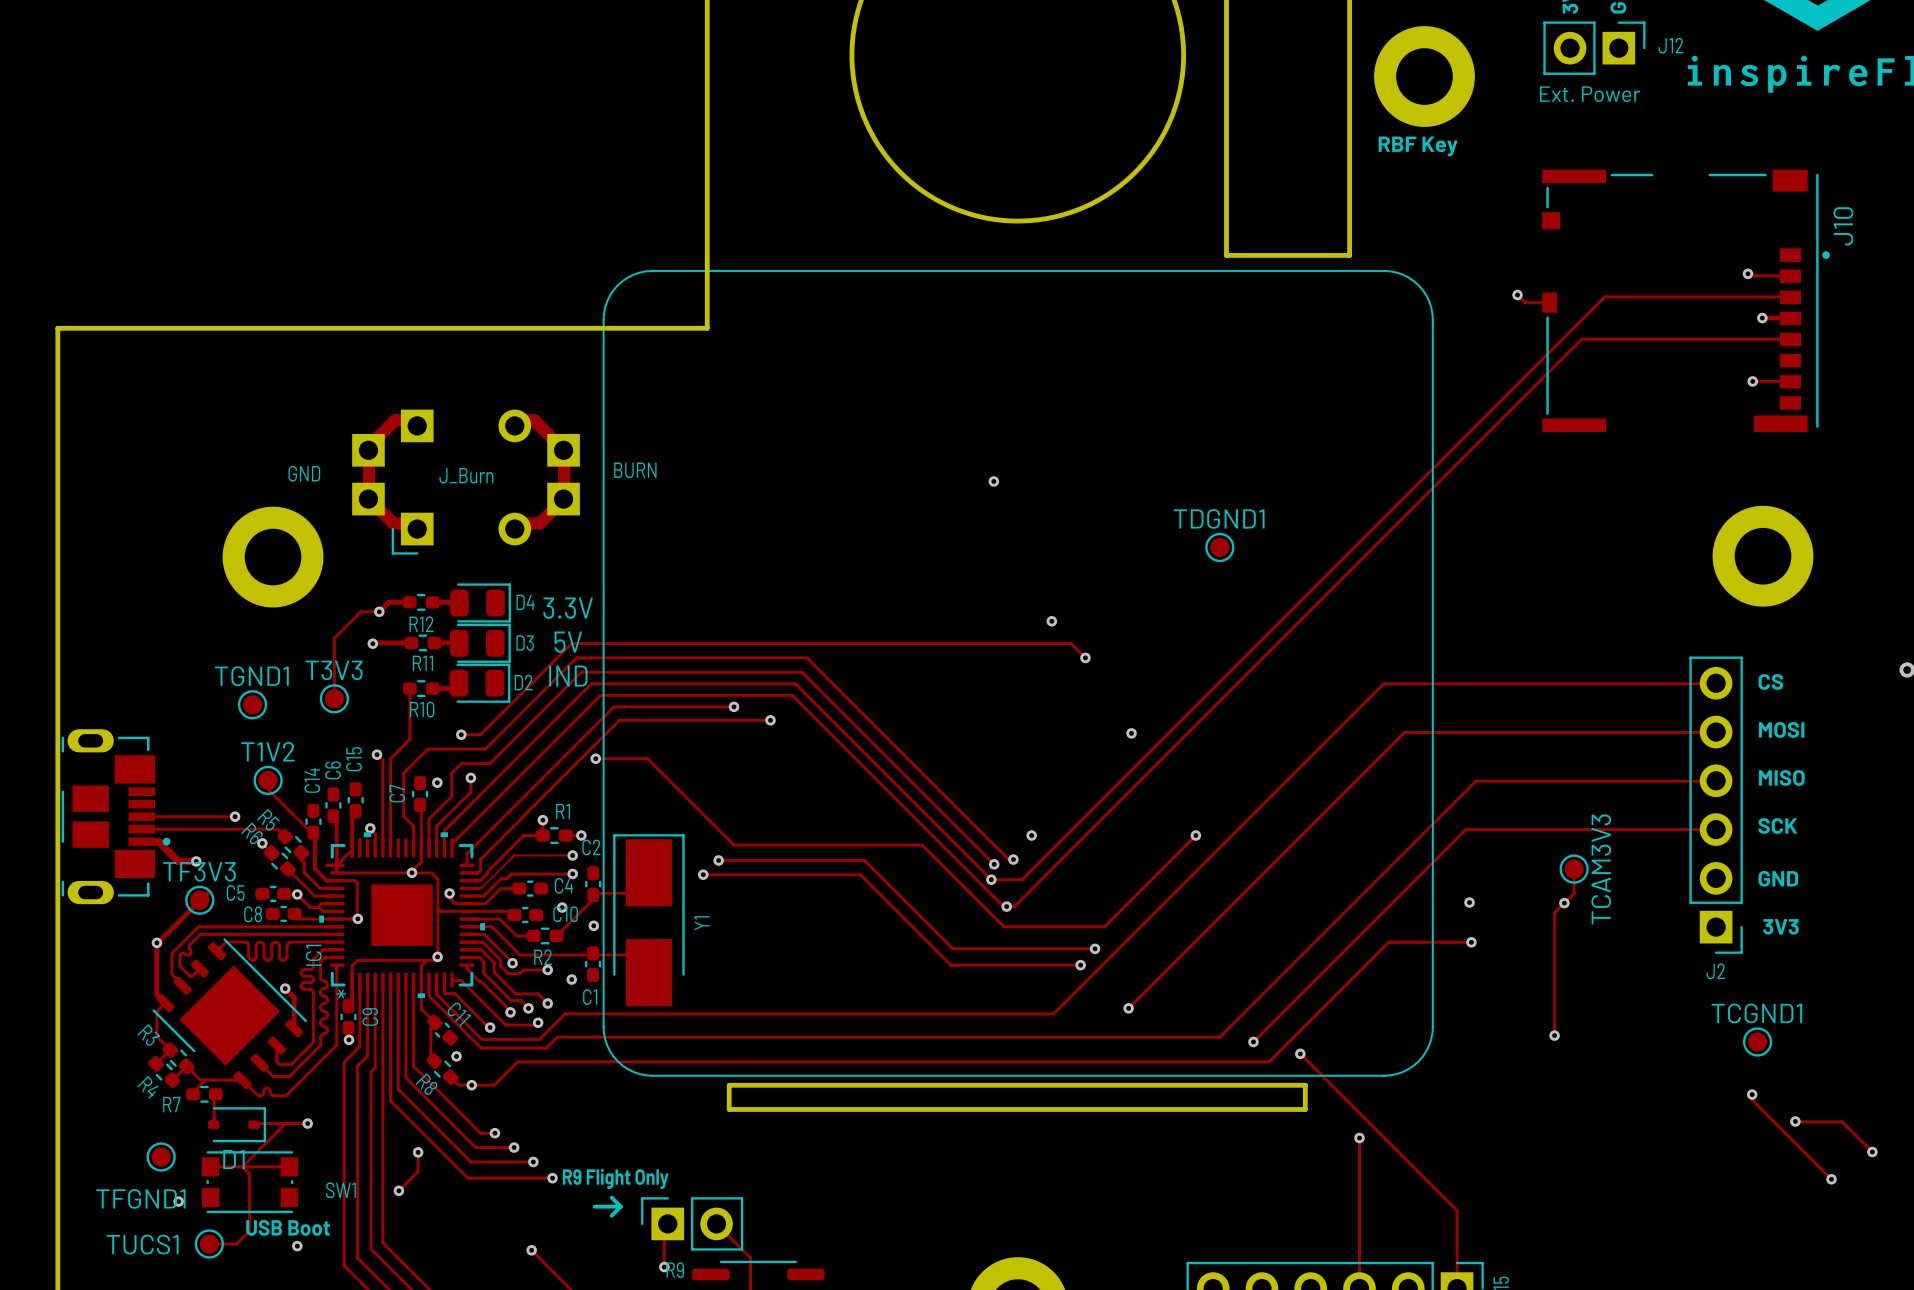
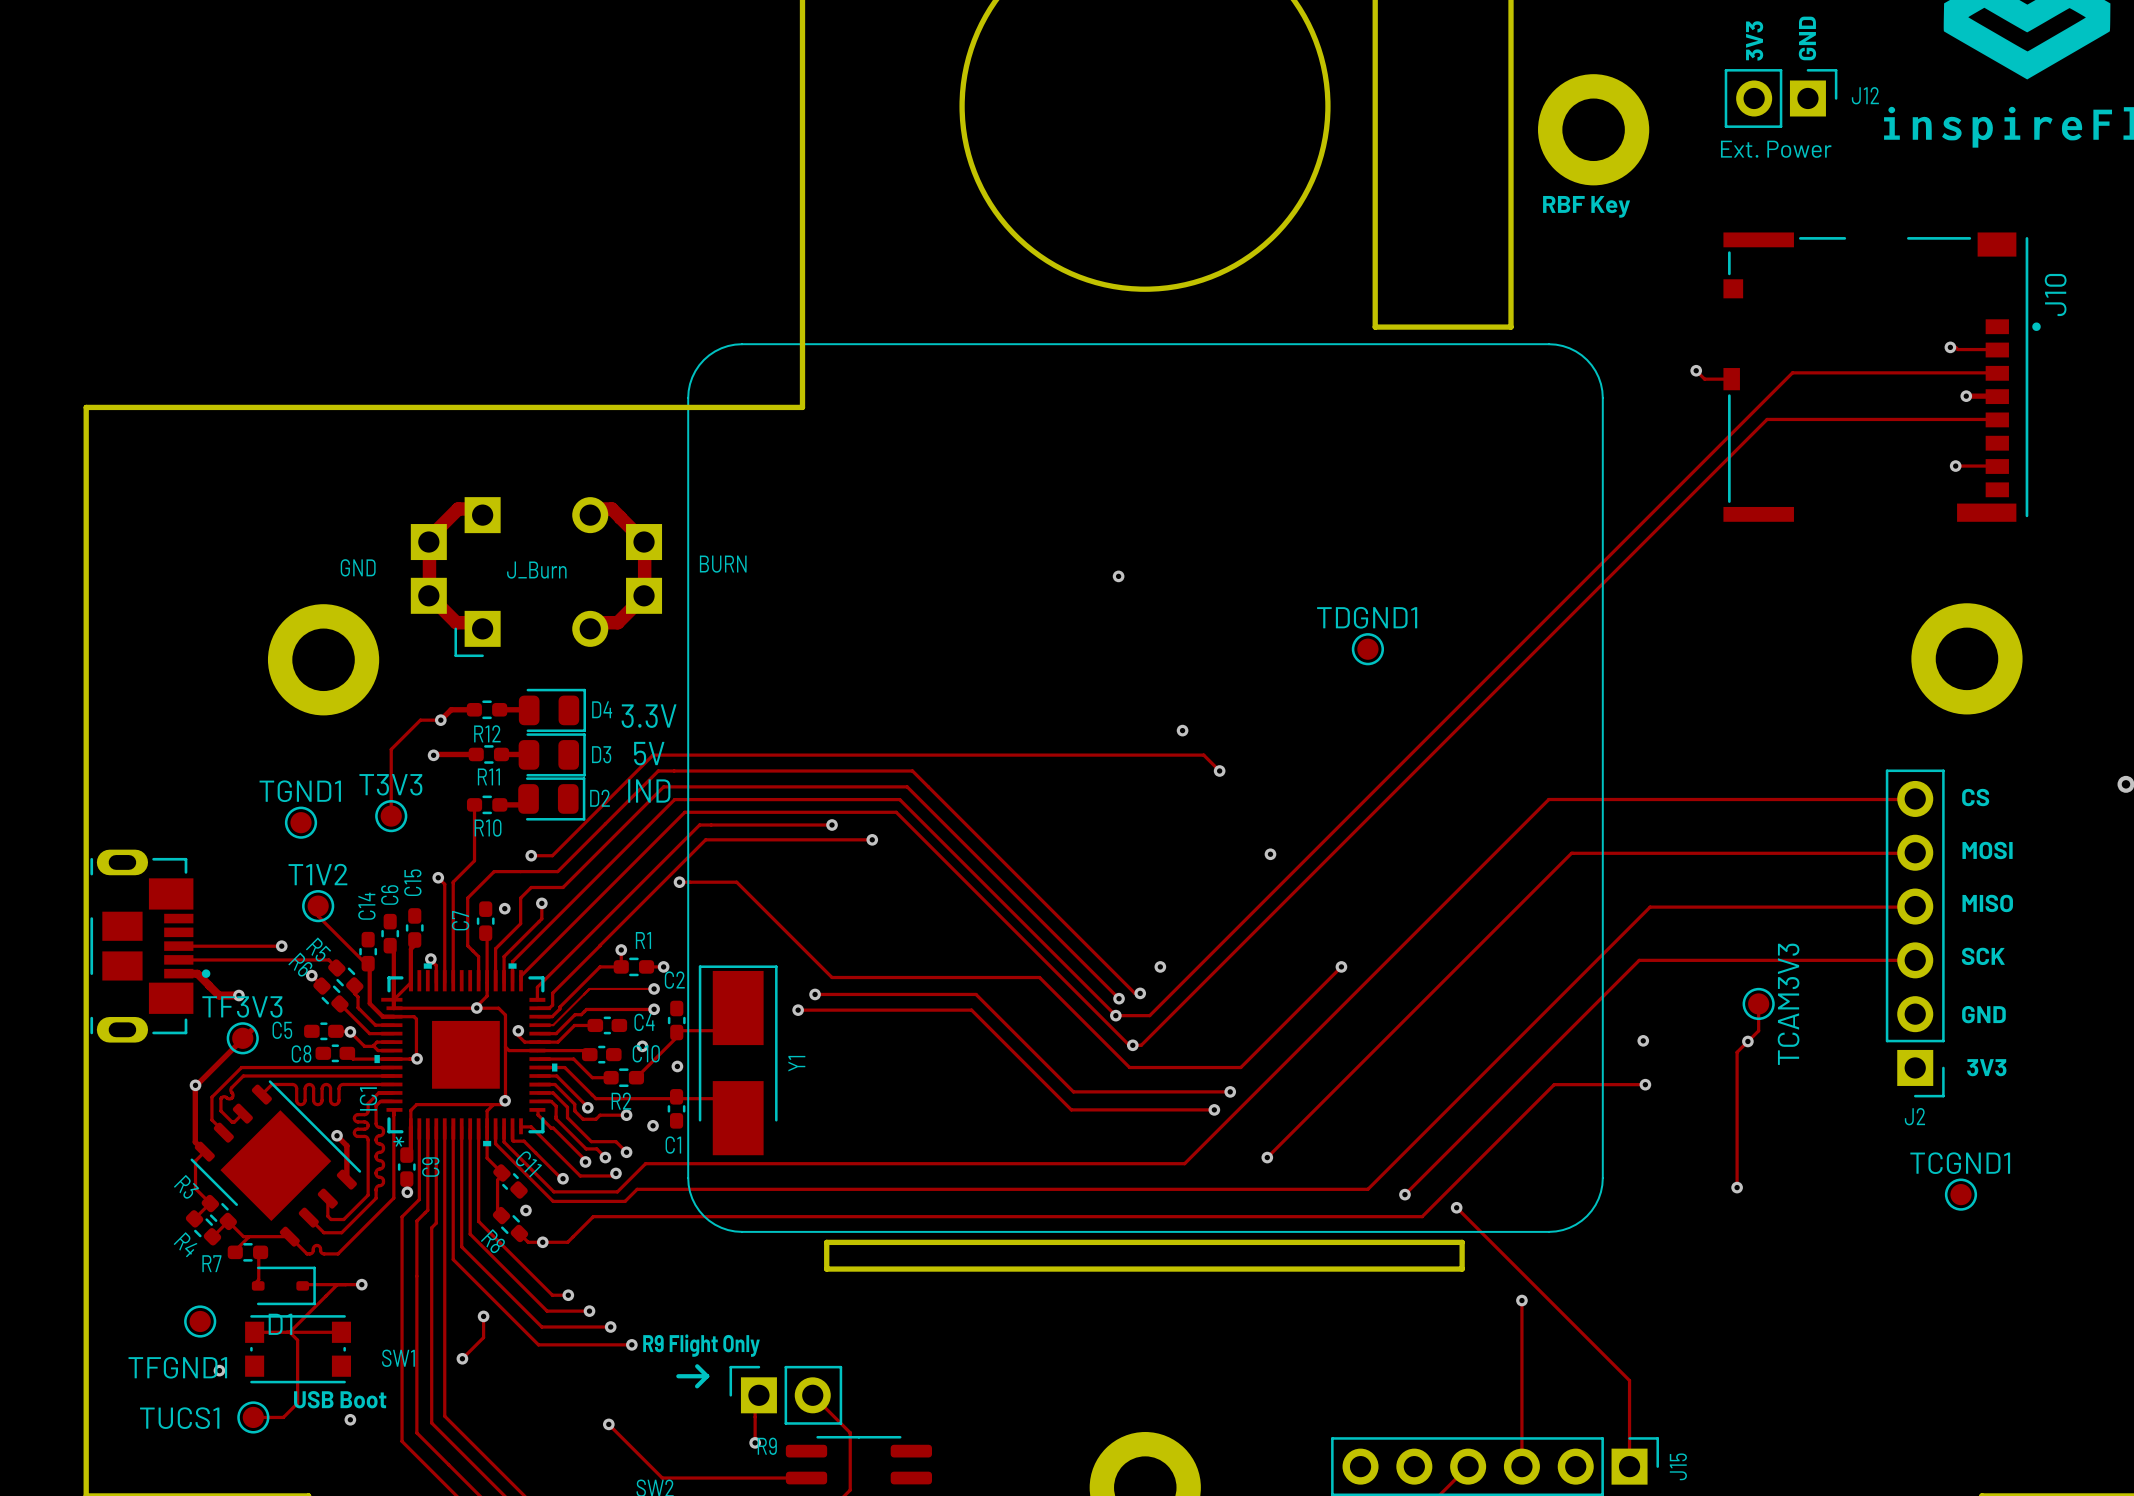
track: (1752, 1094) (1752, 1099) (1831, 1179) -> none
via: (1752, 1094) -> none
track: (1795, 1121) (1842, 1121) (1872, 1152) -> none
via: (1795, 1121) -> none
via: (1872, 1152) -> none
via: (1831, 1179) -> none

